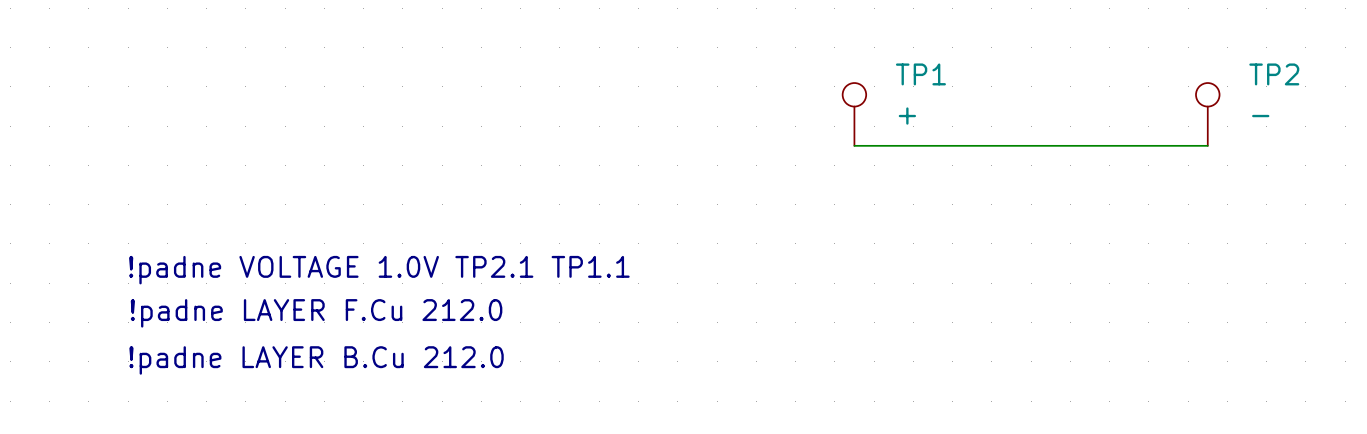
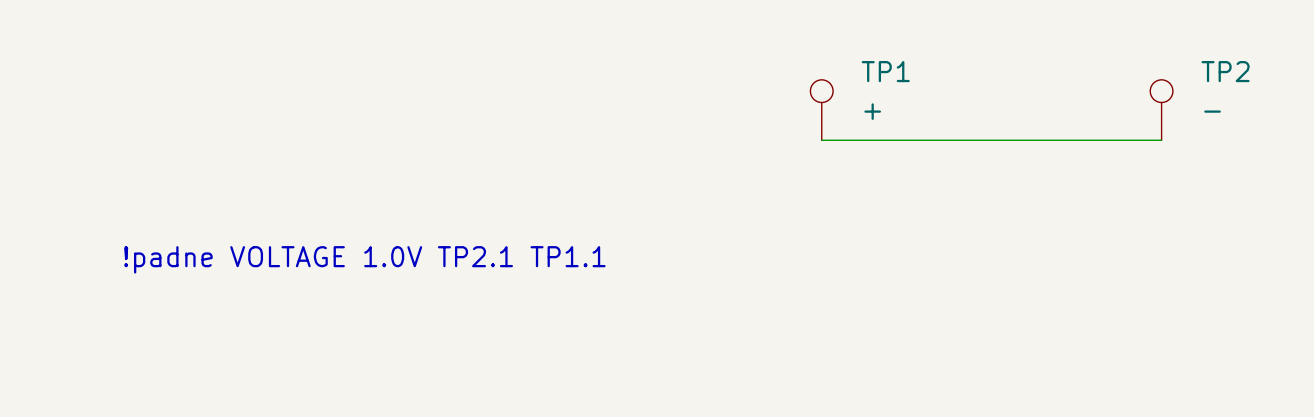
text: !padne LAYER F.Cu 212.0 (316, 313) -> none
text: !padne LAYER B.Cu 212.0 (316, 360) -> none

